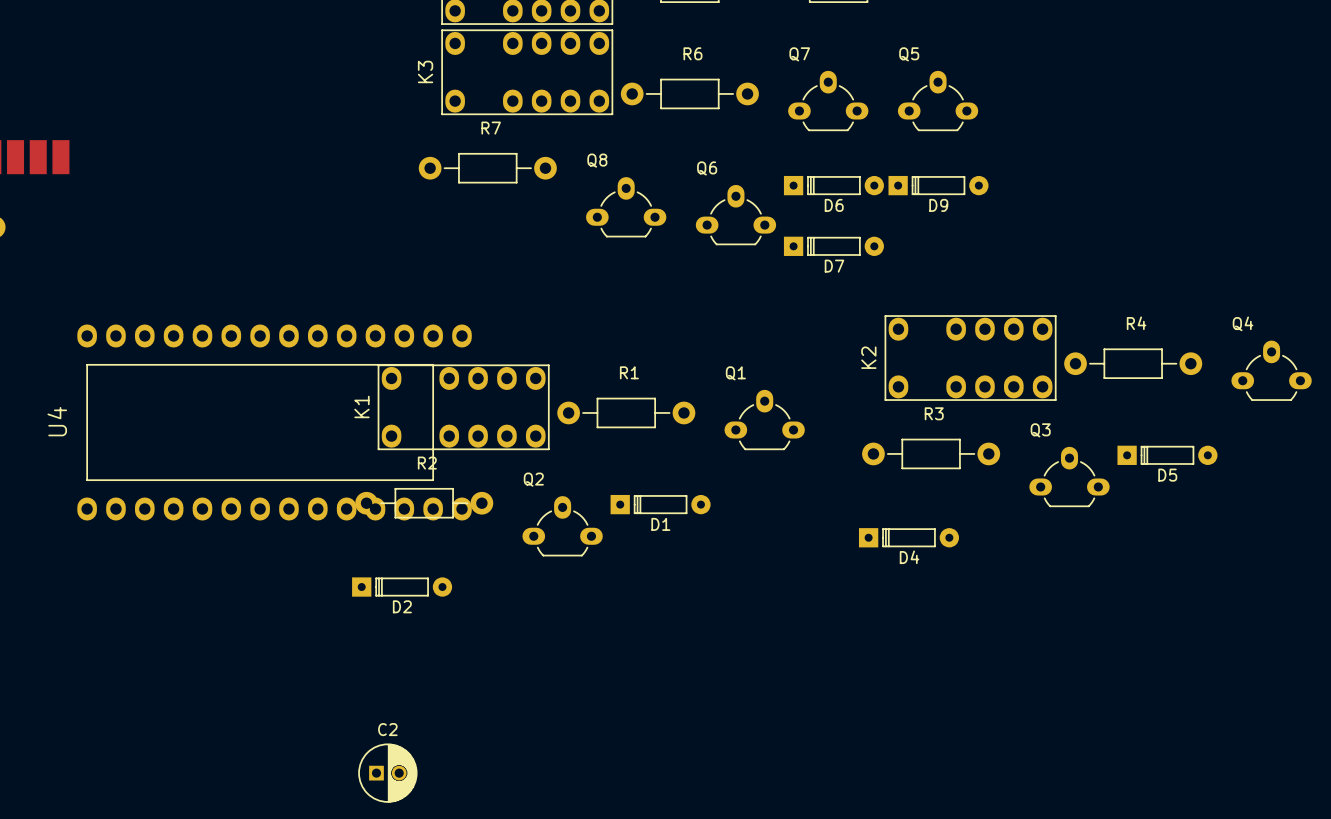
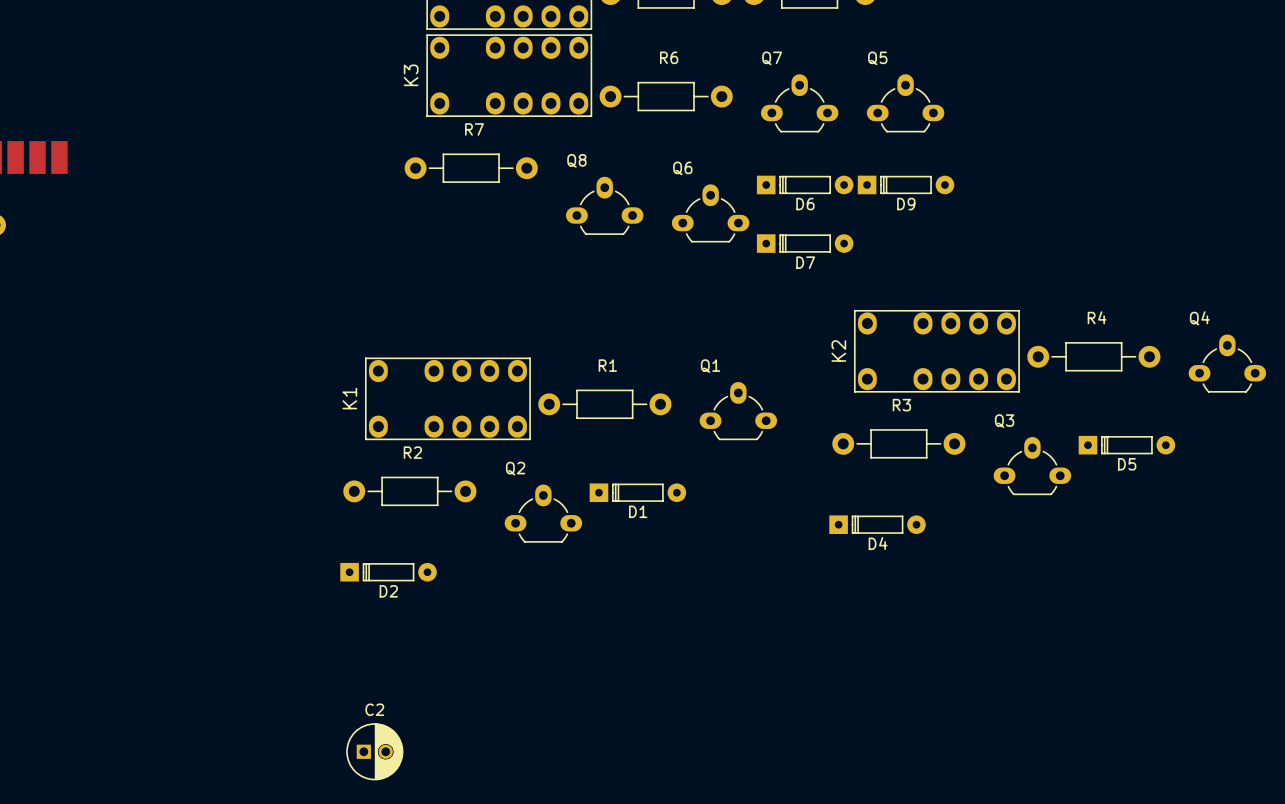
U4: (274, 422) -> none

